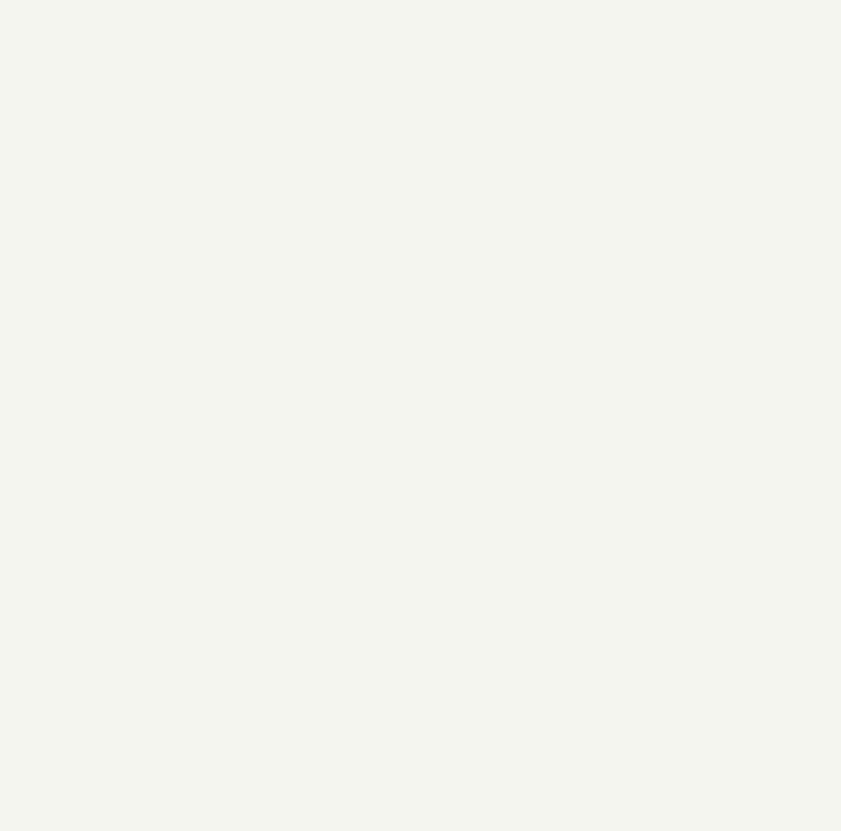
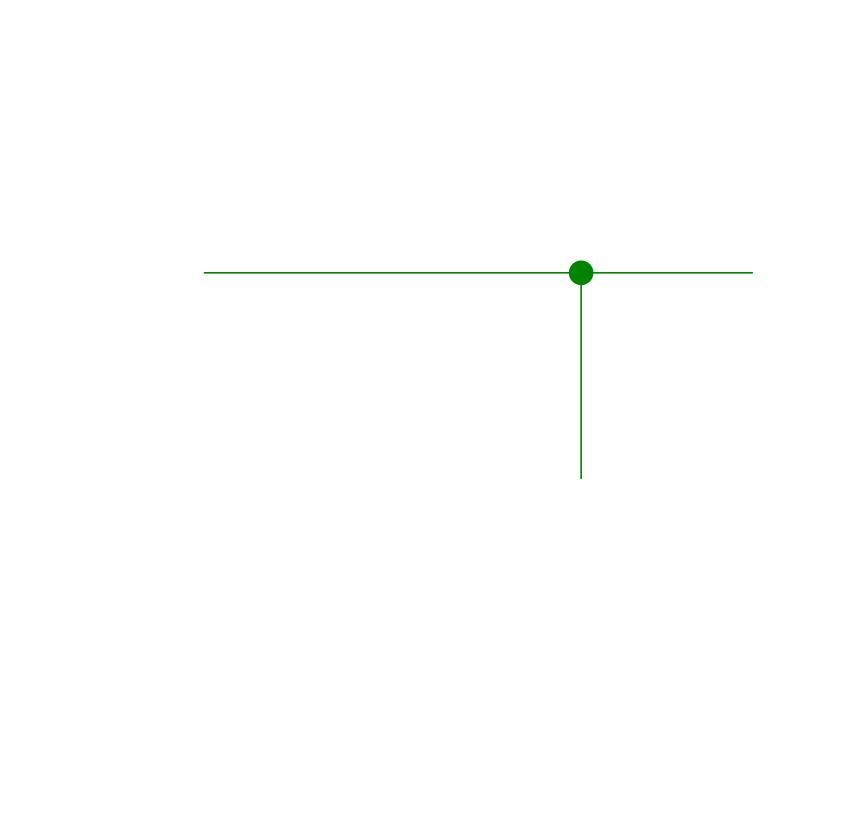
wire: none -> (204, 272) (752, 272)
wire: none -> (581, 272) (581, 478)
junction: none -> (581, 272)

